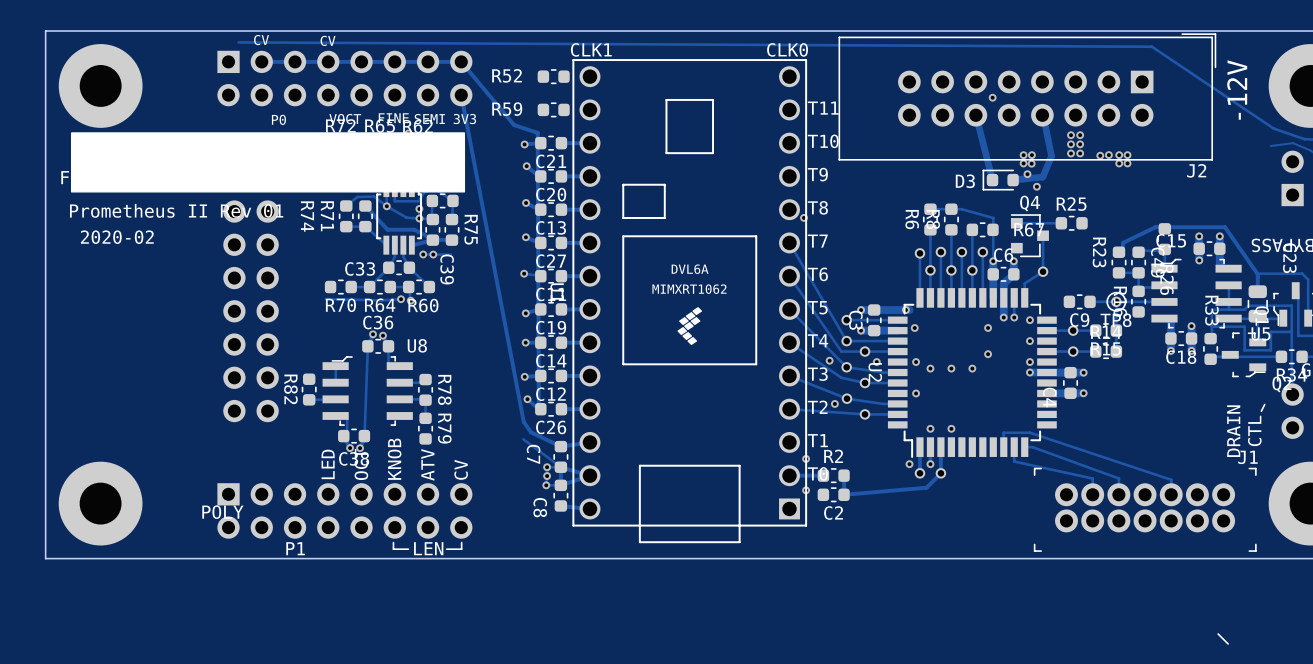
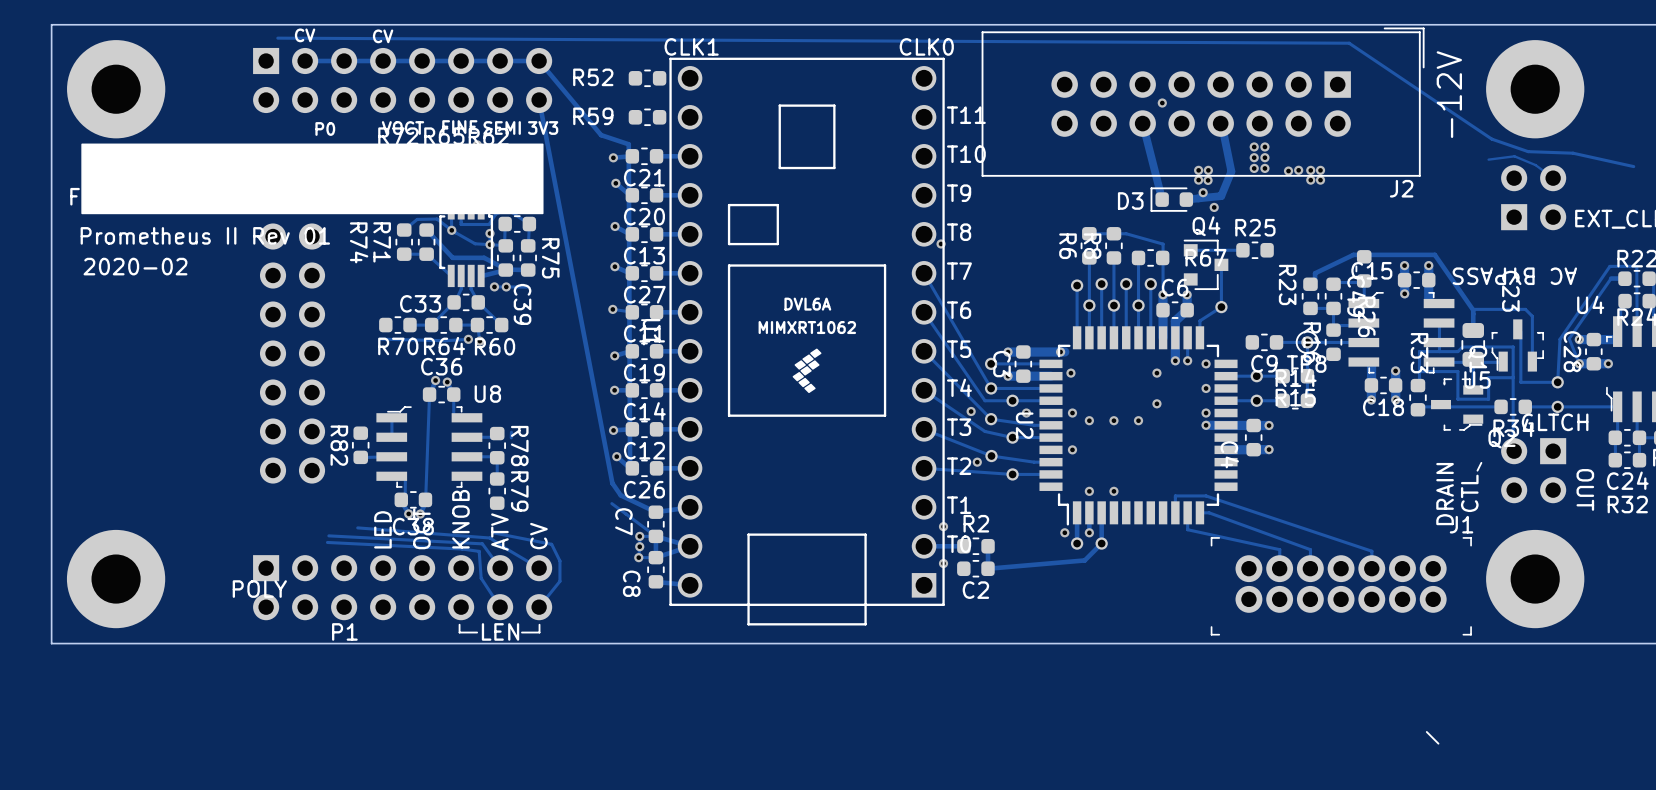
track: none -> (511, 432) (511, 437)
track: none -> (357, 527) (489, 538) (539, 568)
track: none -> (493, 532) (551, 544) (559, 561) (559, 581) (539, 607)
track: none -> (328, 535) (482, 543) (500, 568)
track: none -> (327, 542) (479, 551) (481, 578) (500, 607)

